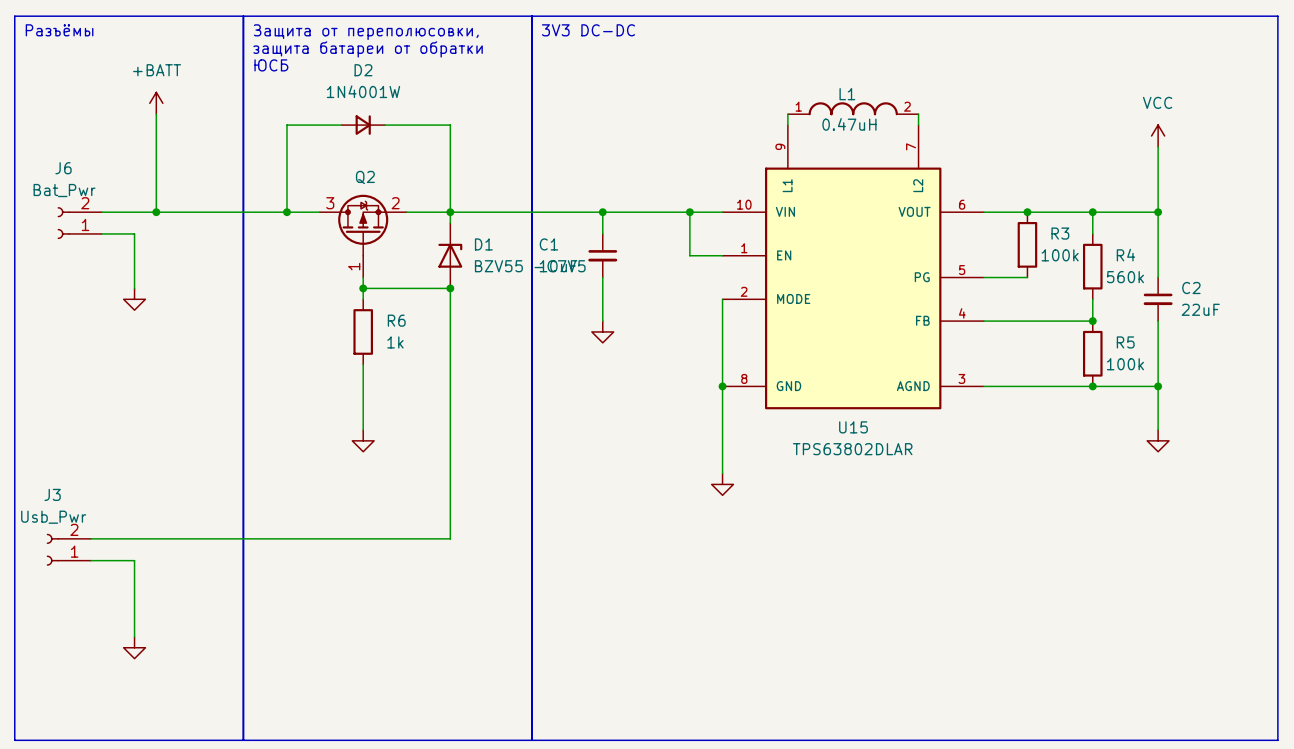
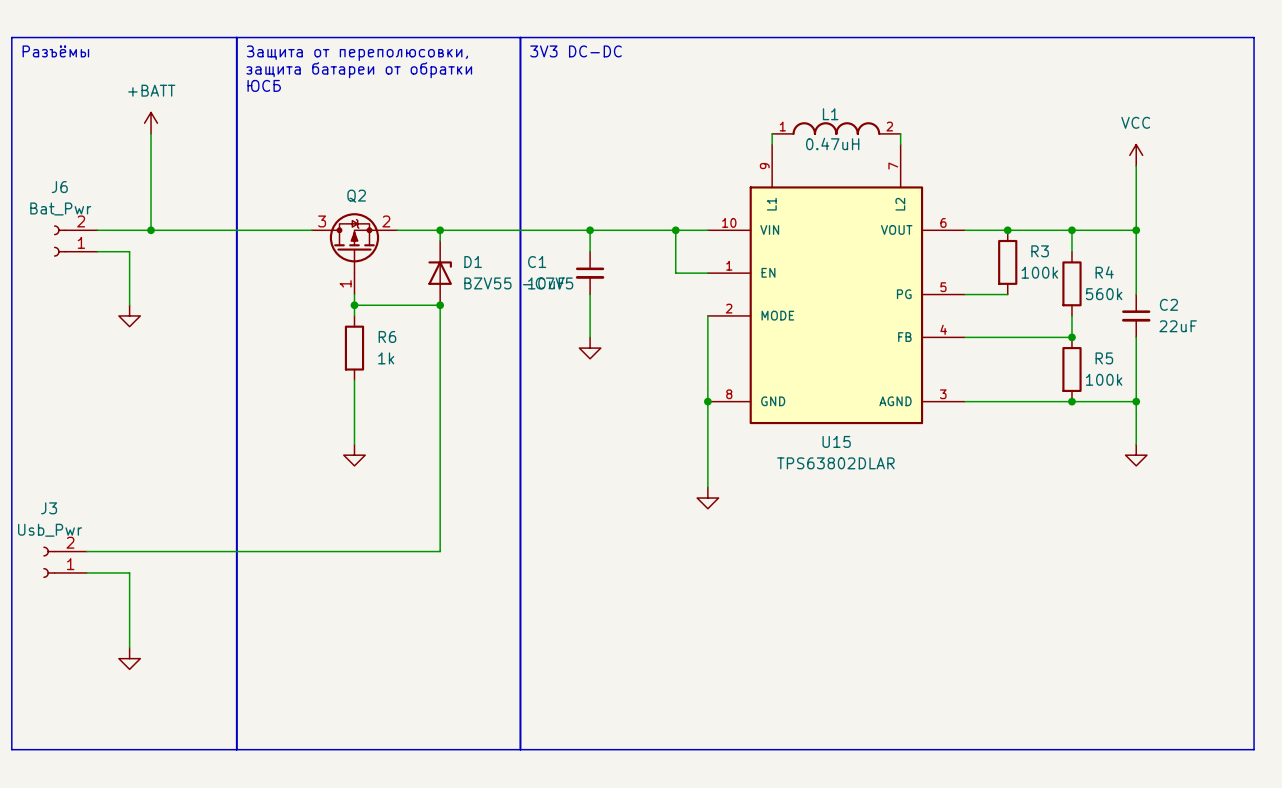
wire: (341, 125) (286, 125) (286, 212) -> none
D2: 1N4001W (363, 125) -> none
wire: (384, 125) (450, 125) (450, 212) -> none
junction: (286, 212) -> none

